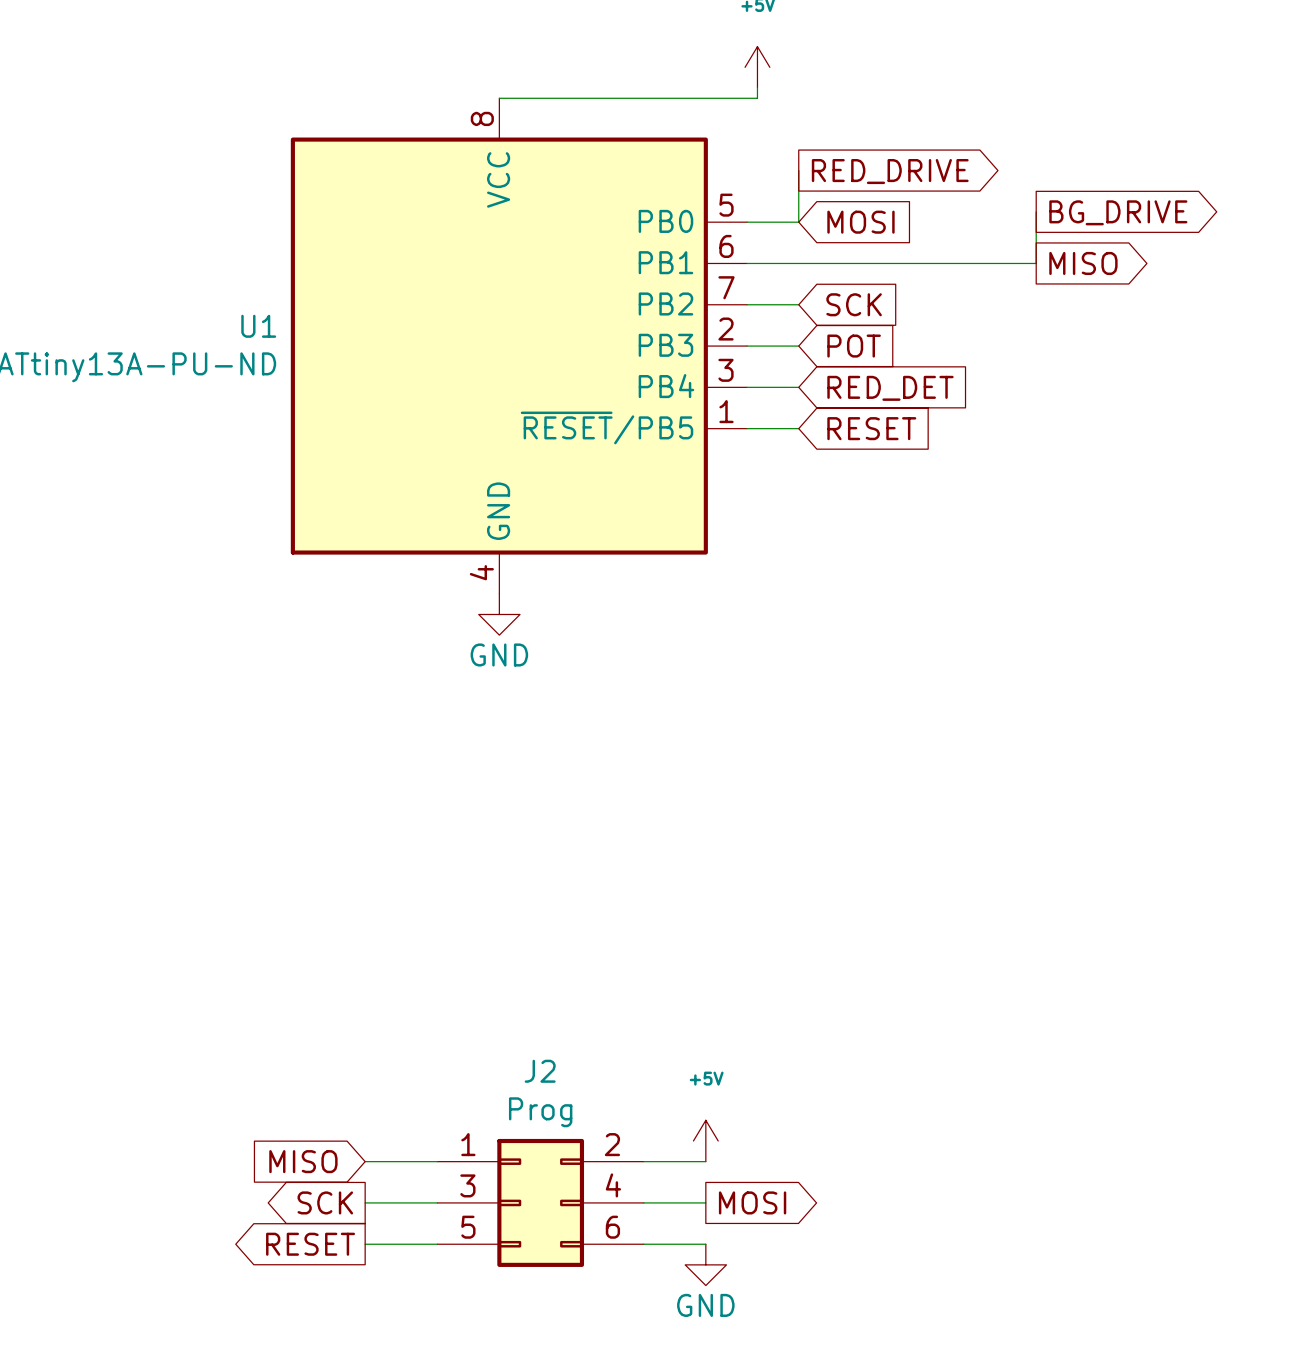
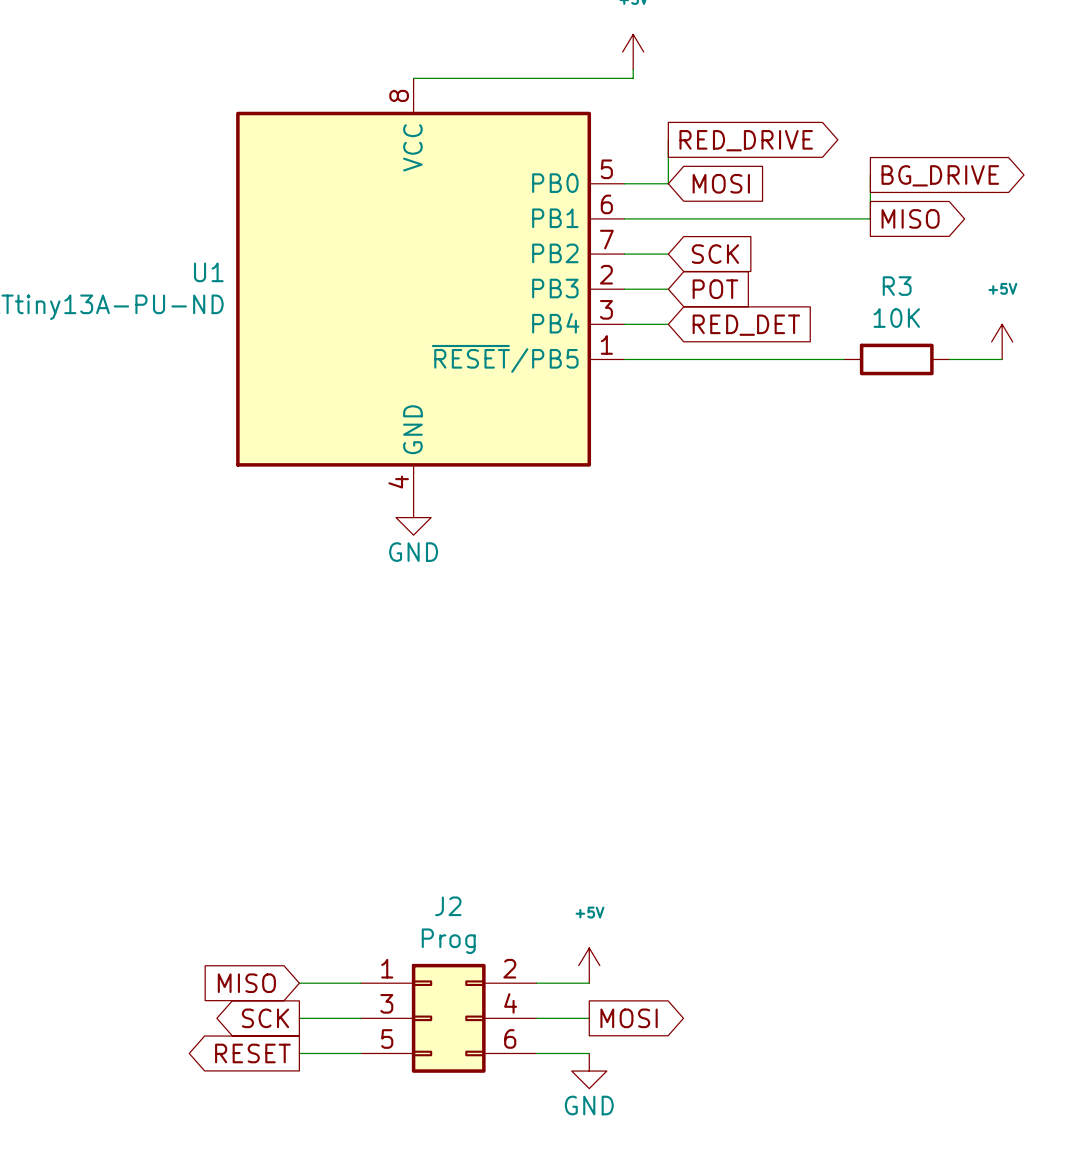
power symbol: none -> +5V (1002, 341)
wire: none -> (668, 359) (844, 359)
global label: RESET (871, 428) -> none
R3: none -> 10K (896, 359)
wire: none -> (949, 359) (1002, 359)

